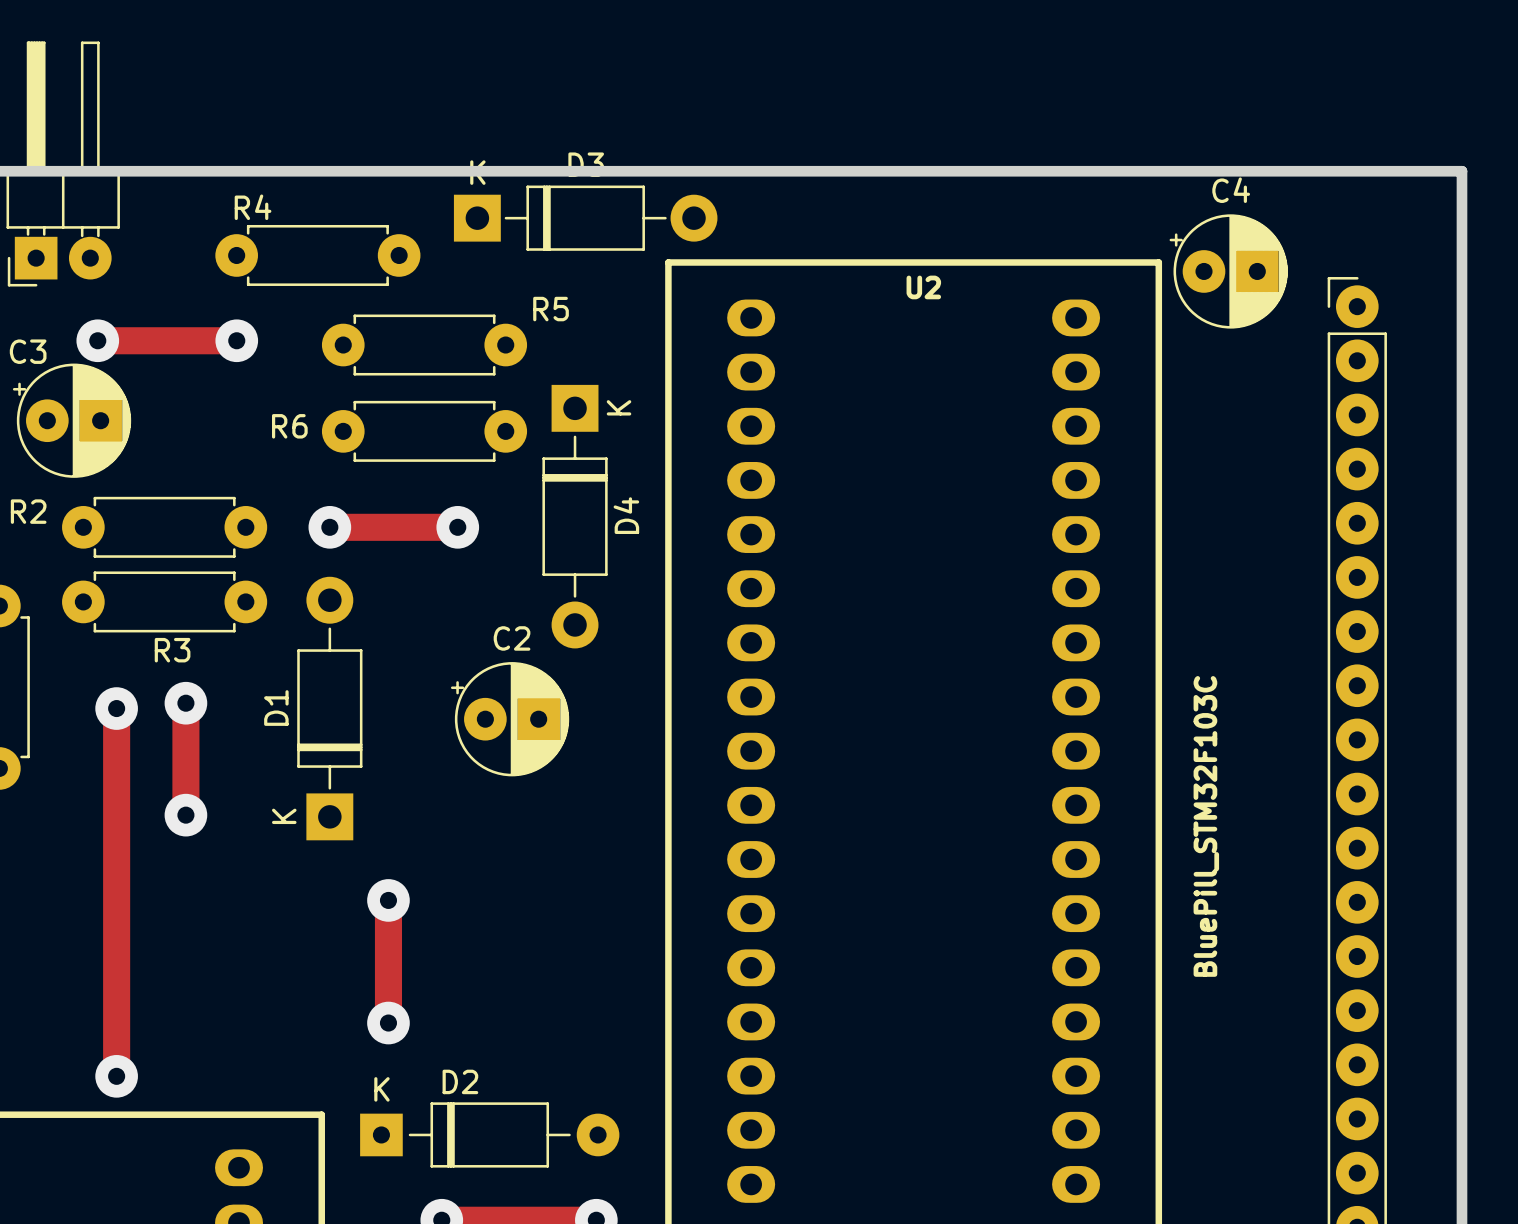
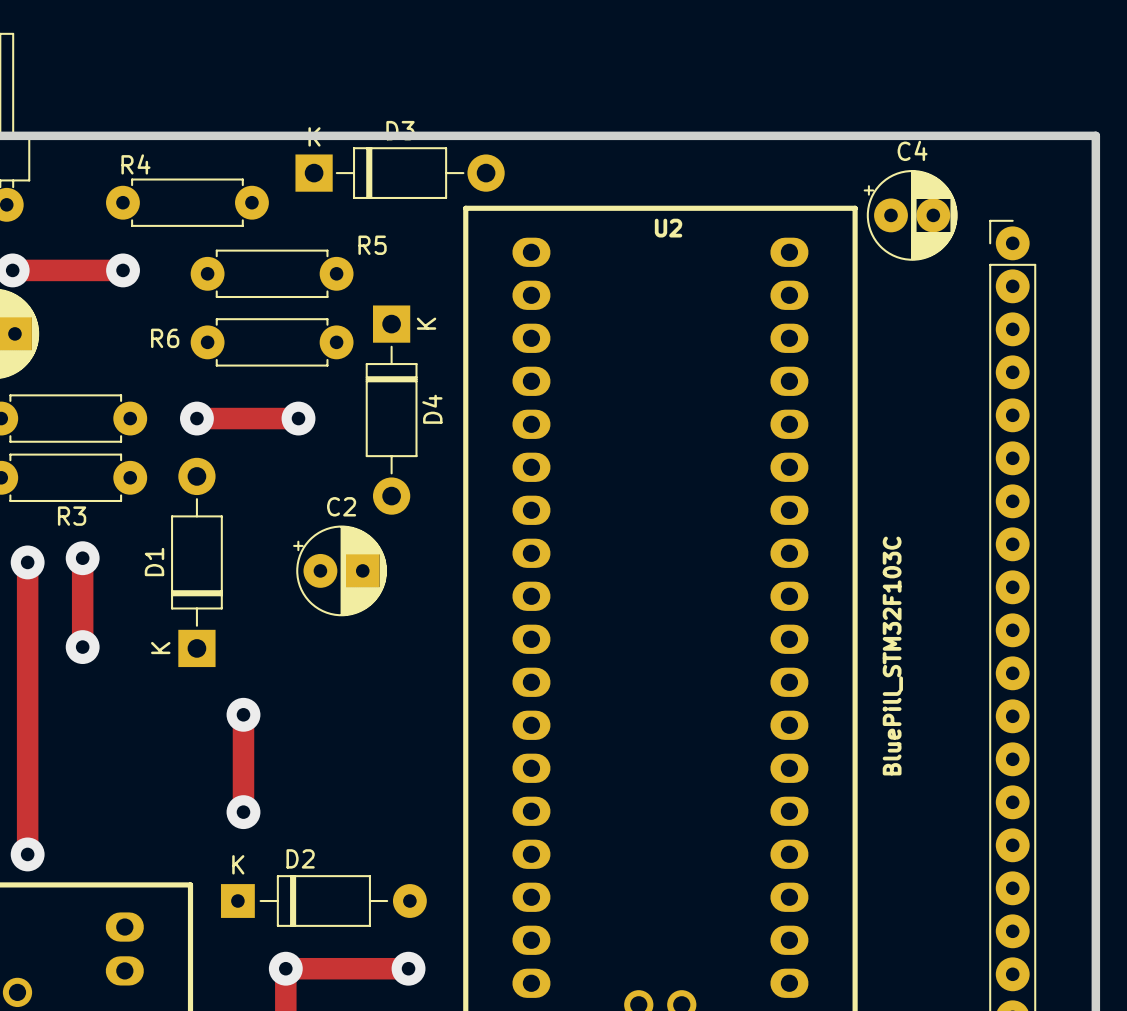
C4 footprint: [1169, 214, 1288, 329] -> [863, 170, 958, 261]

